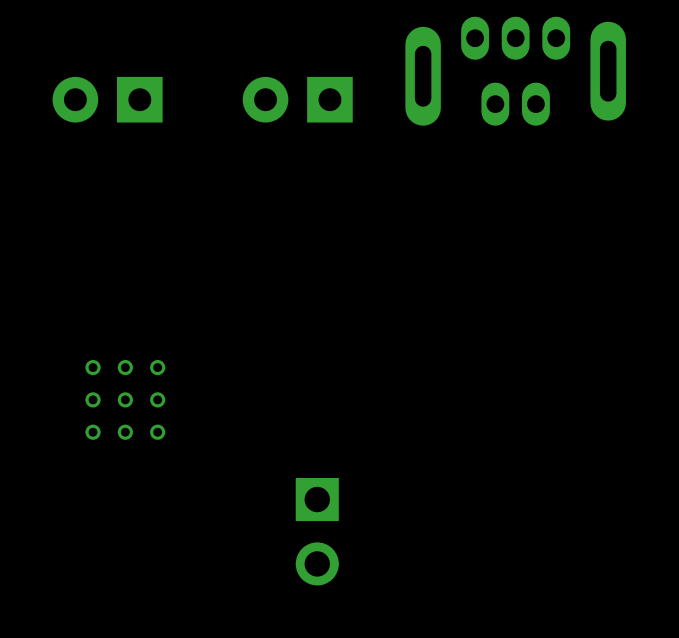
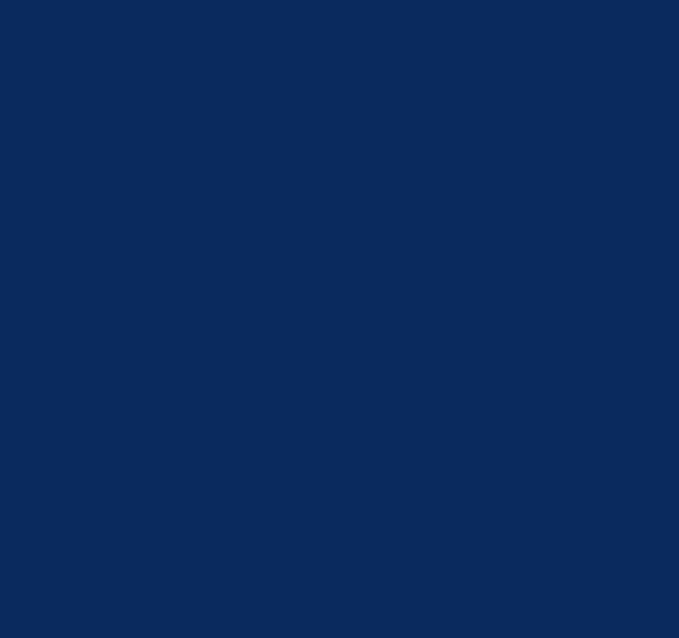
part: (515, 71) -> none
part: (107, 99) -> none
part: (297, 99) -> none
part: (125, 399) -> none
part: (317, 531) -> none

